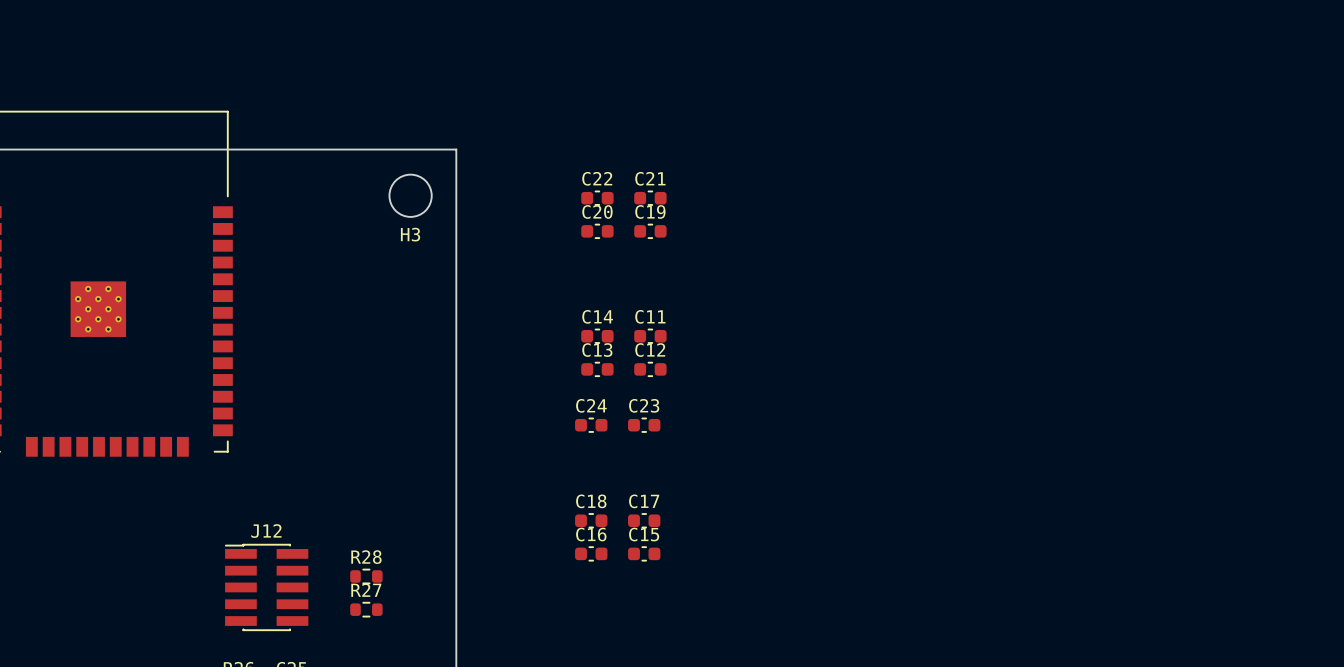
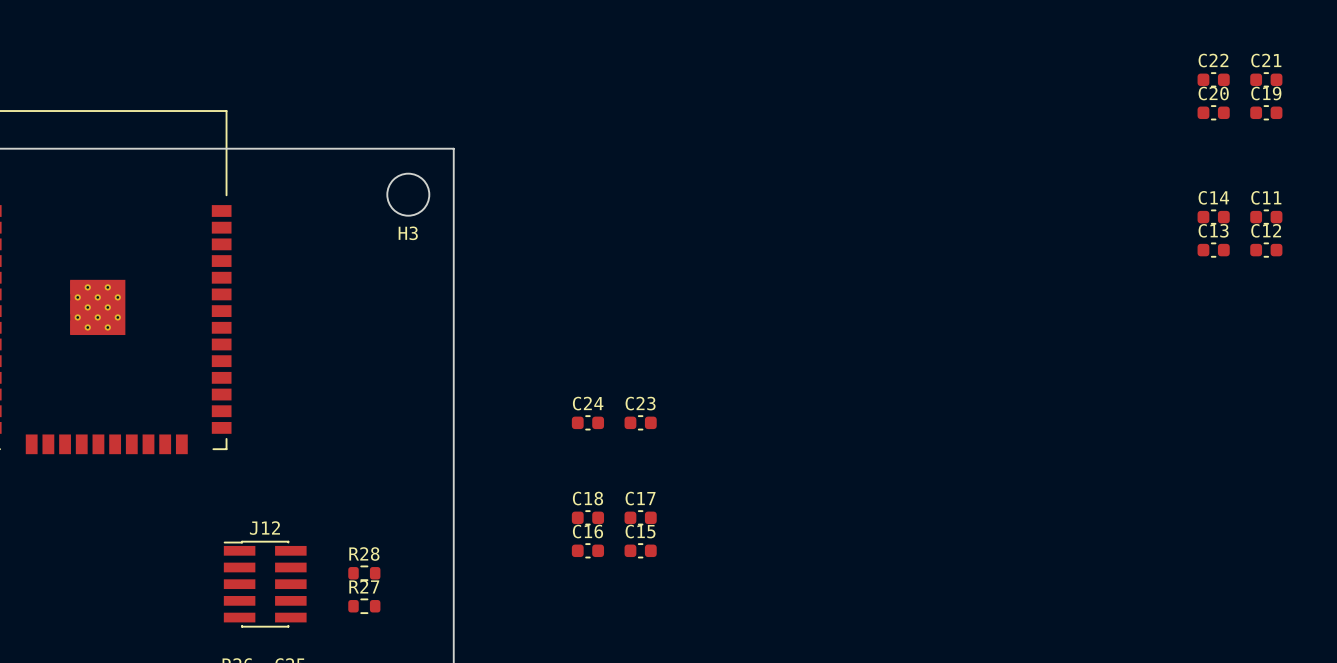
C22 position: (597, 198) -> (1213, 79)
C21 position: (650, 198) -> (1266, 79)
C20 position: (597, 231) -> (1213, 112)
C19 position: (650, 231) -> (1266, 112)
C14 position: (597, 336) -> (1213, 217)
C11 position: (650, 336) -> (1266, 217)
C13 position: (597, 369) -> (1213, 250)
C12 position: (650, 369) -> (1266, 250)

